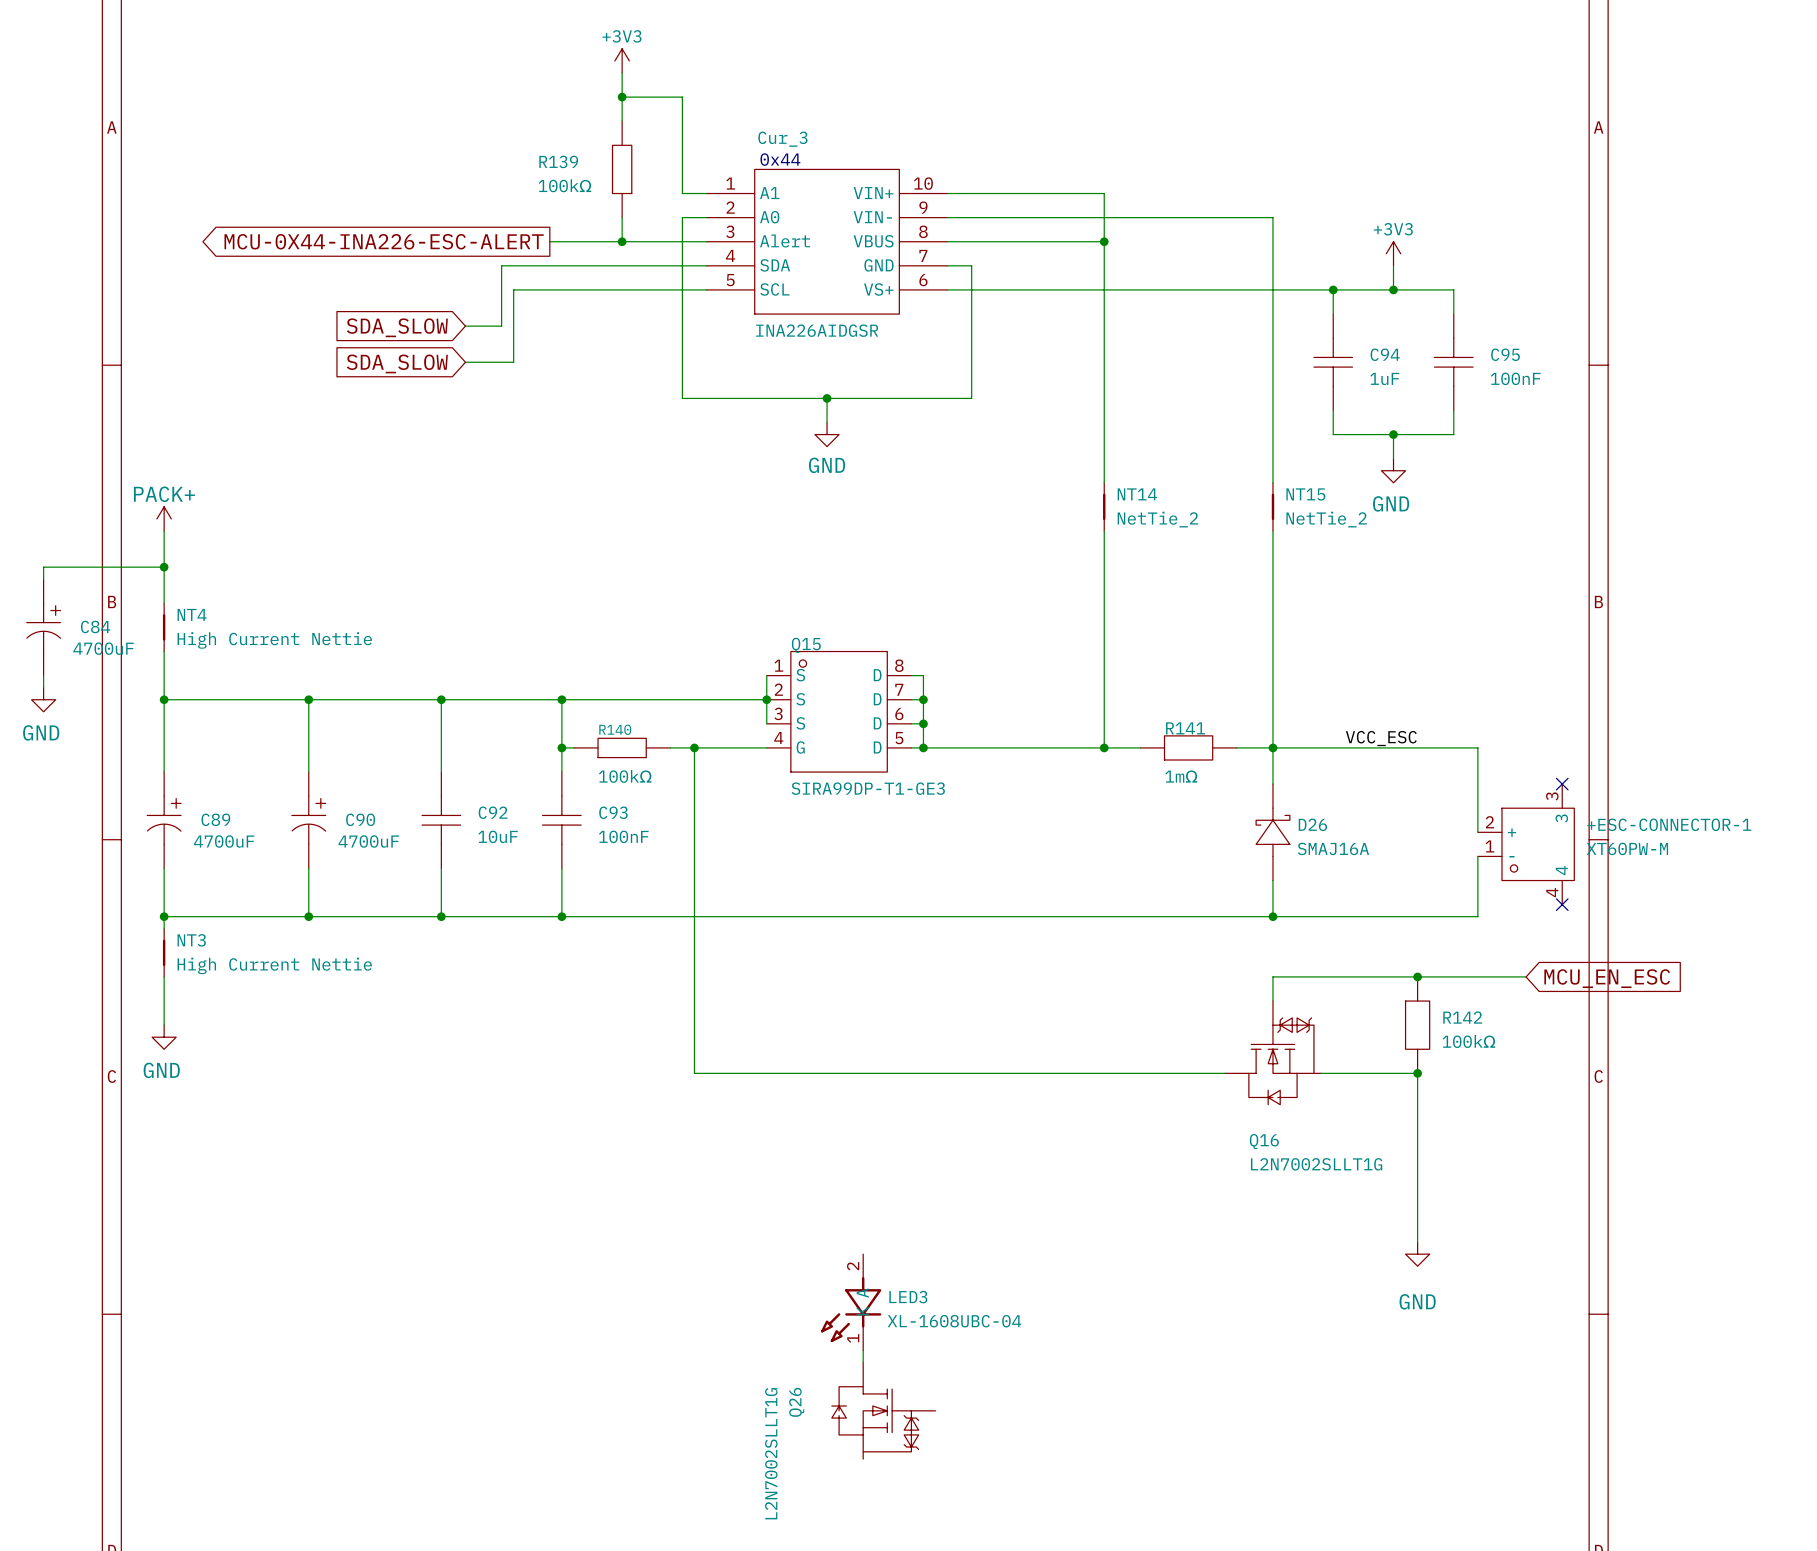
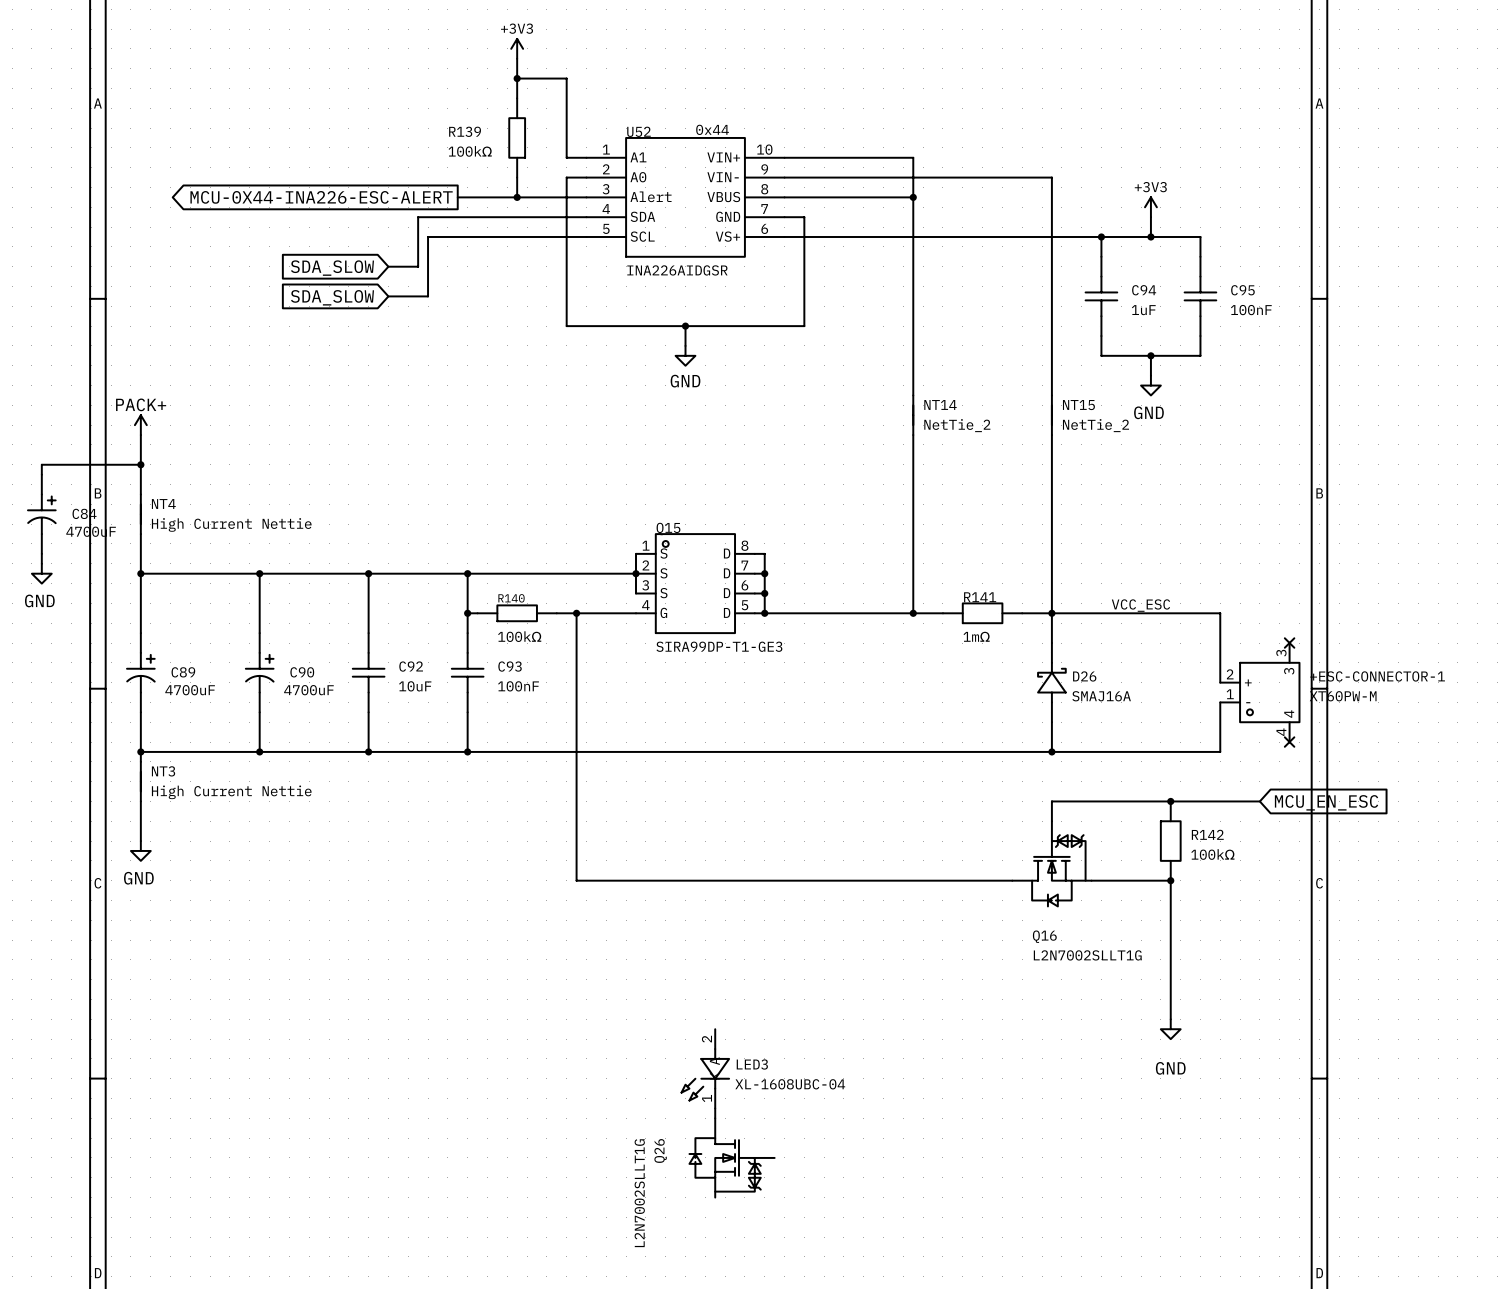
Cur_3 name: Cur_3 (782, 139) -> U52 (638, 131)
text position: 0x44 (780, 159) -> 0x44 (712, 129)

